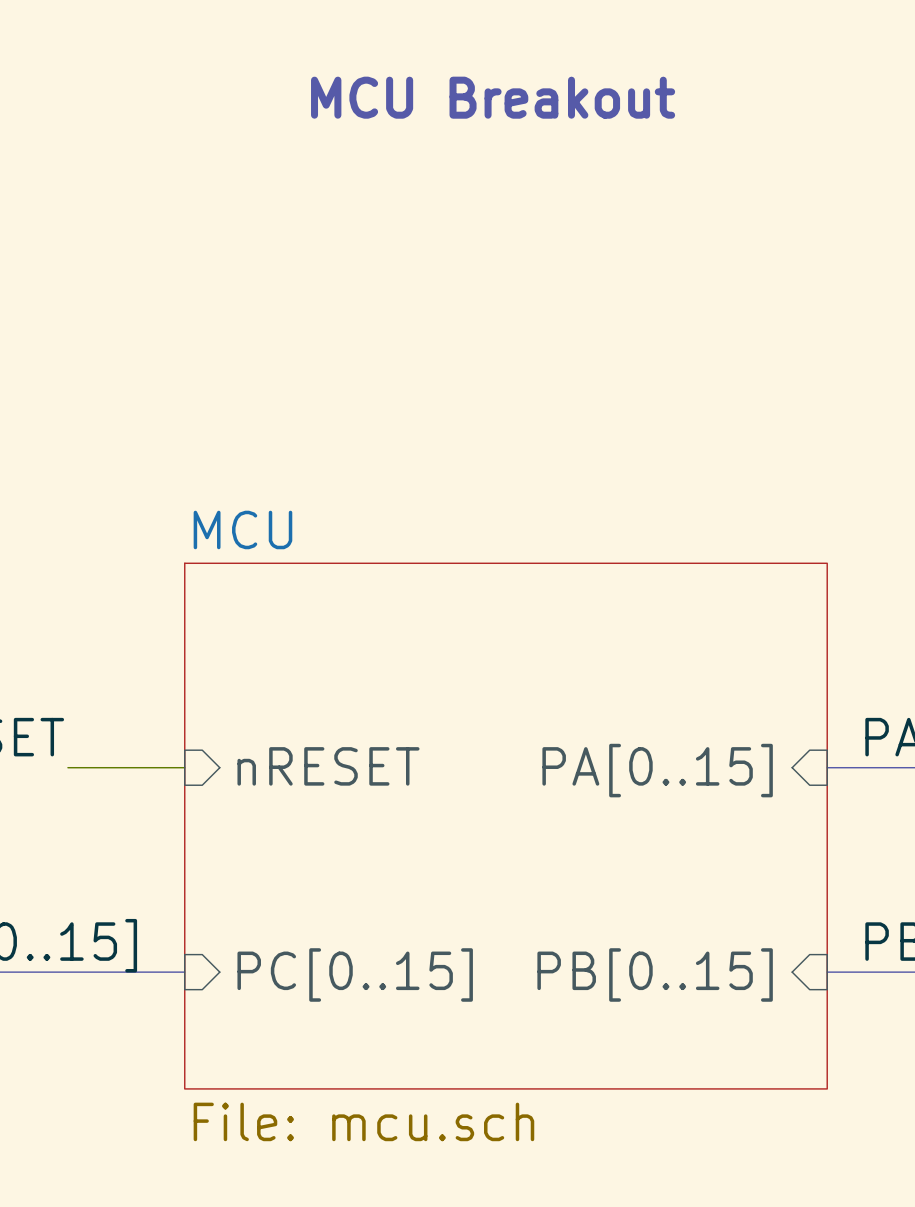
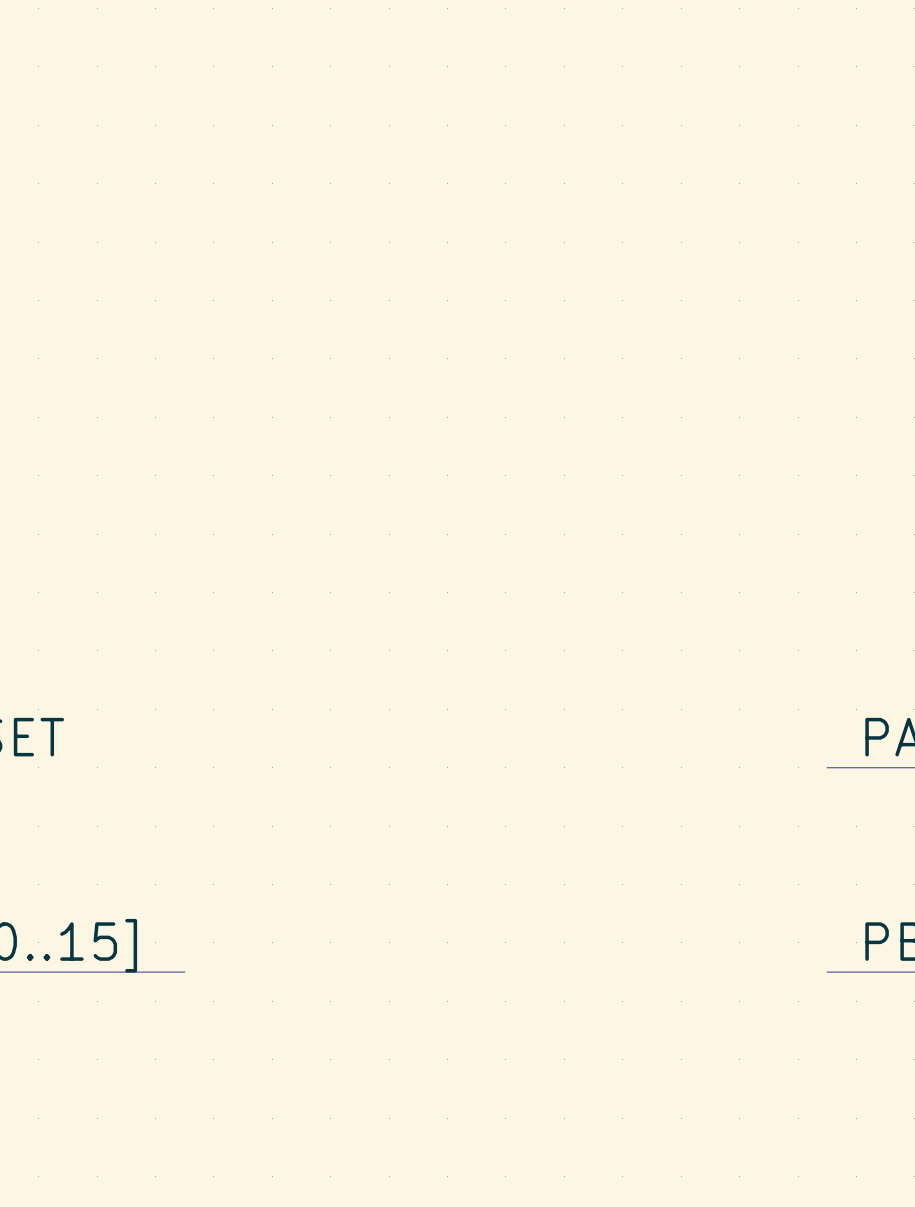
text: MCU Breakout (493, 97) -> none
sheet pin: nRESET (328, 766) -> none
wire: (67, 767) (184, 767) -> none
sheet pin: PA[0..15] (657, 770) -> none
sheet MCU: File: mcu.sch (505, 826) -> none
sheet pin: PC[0..15] (355, 974) -> none
sheet pin: PB[0..15] (655, 974) -> none

